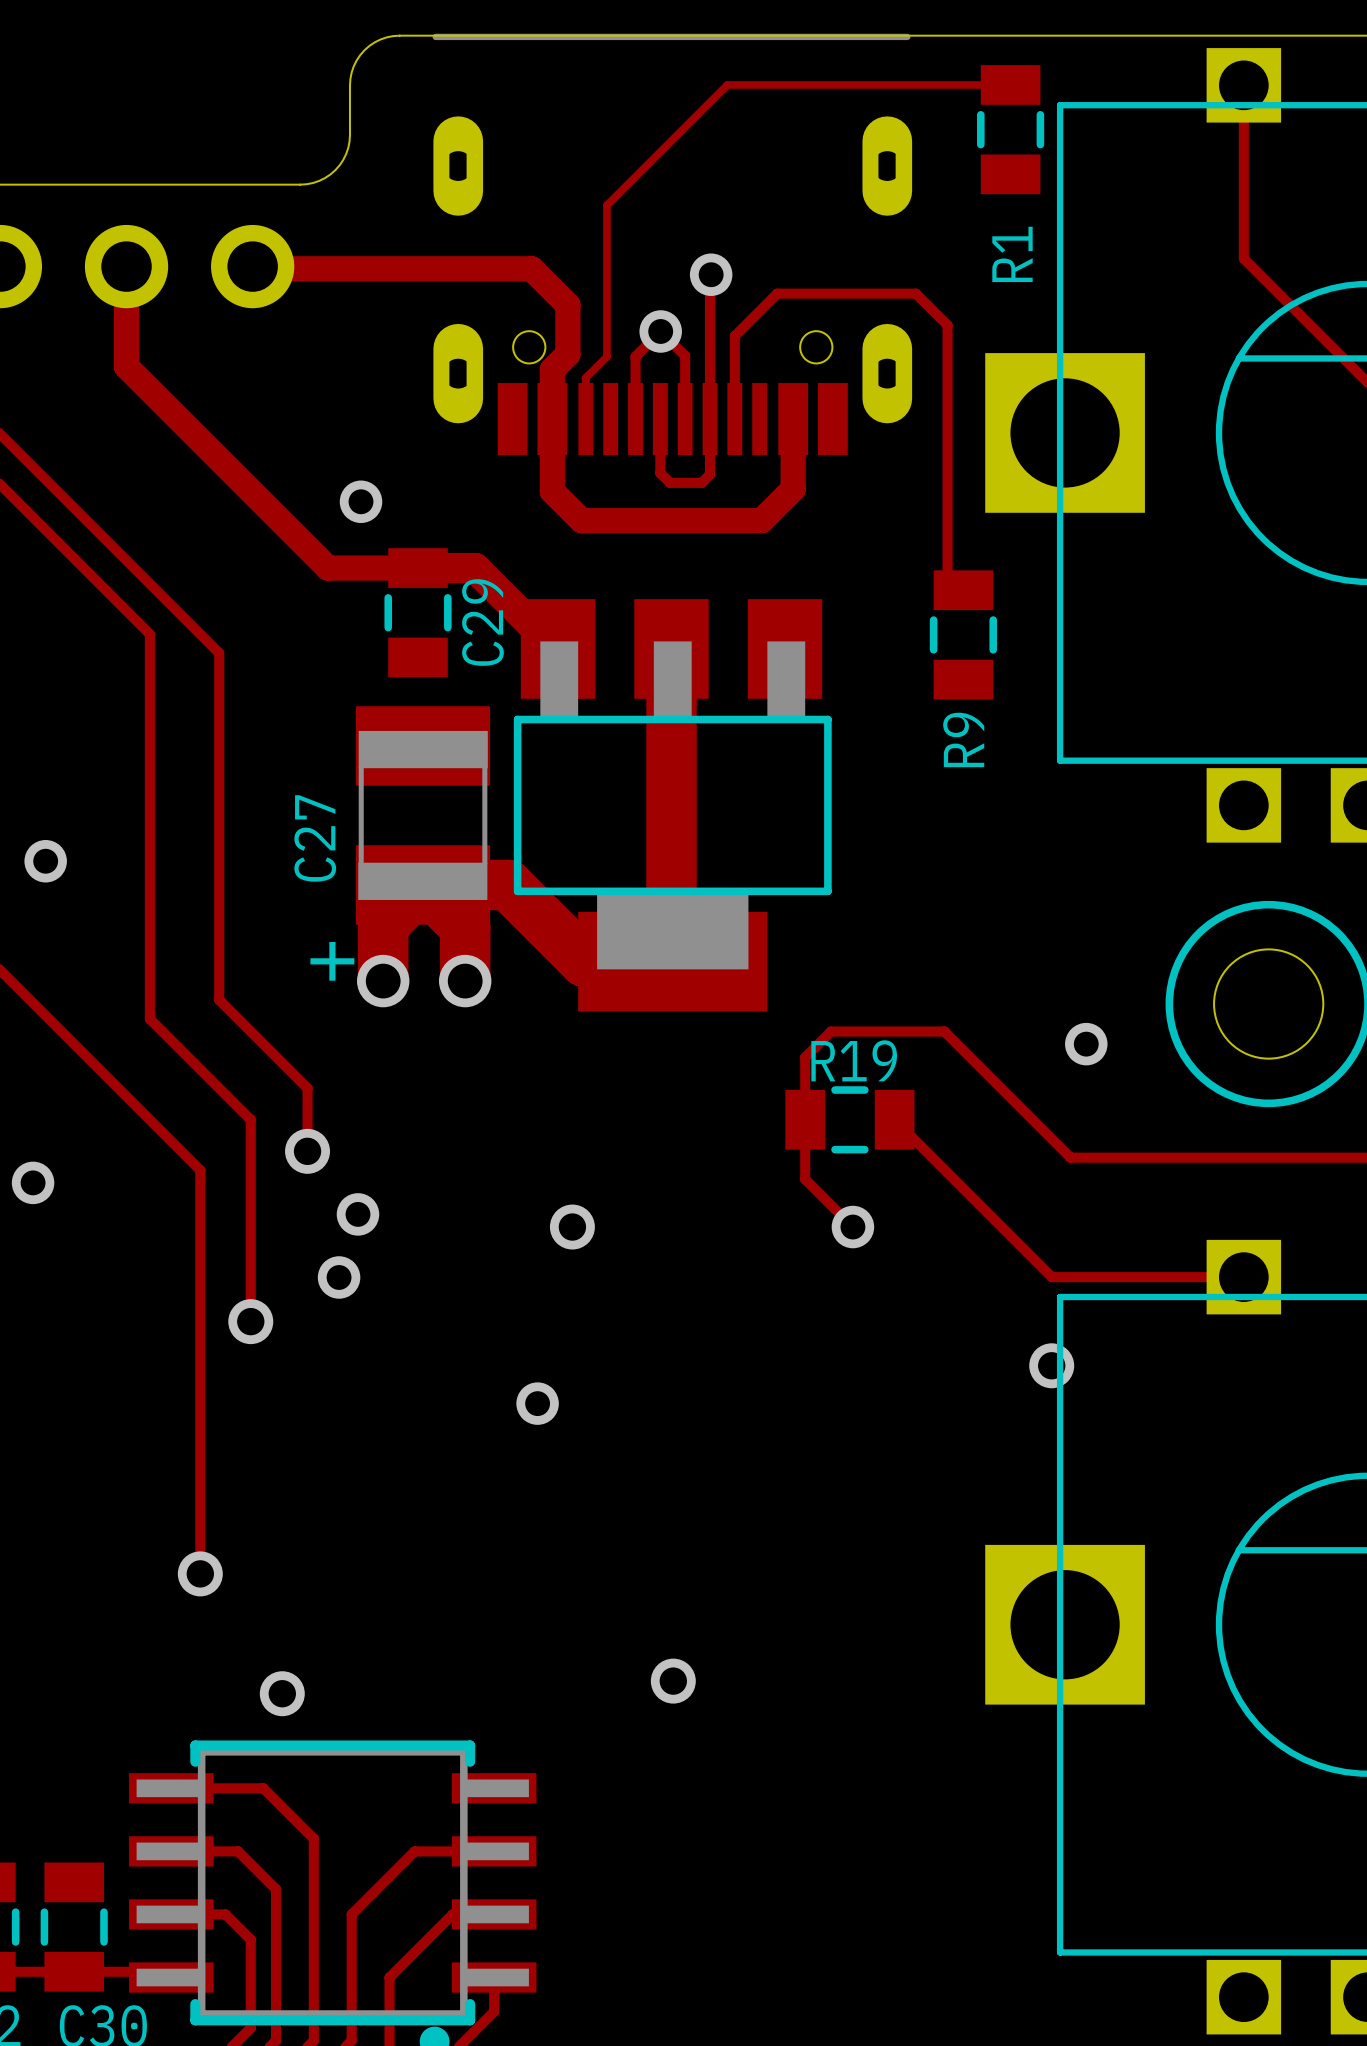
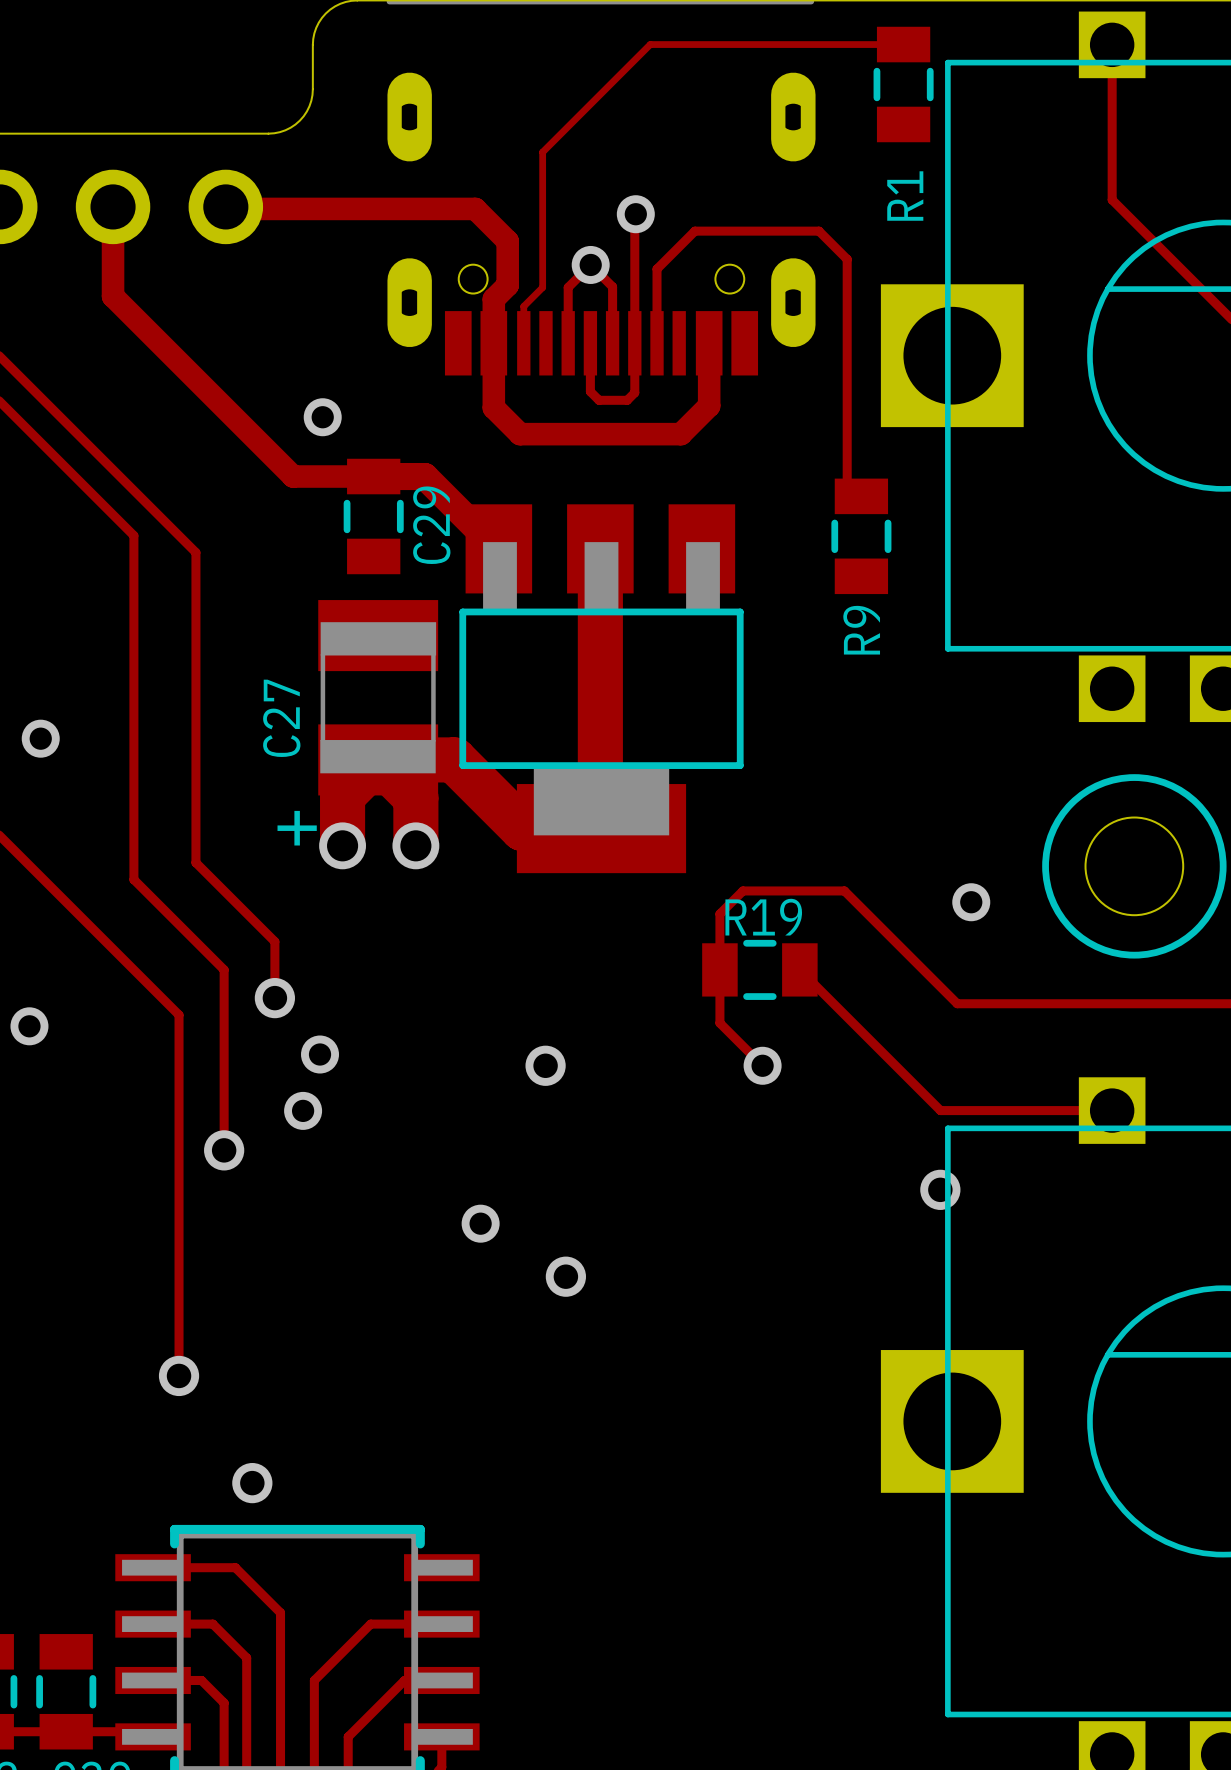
via position: (572, 1227) -> (545, 1065)
via: none -> (565, 1276)
via: (673, 1681) -> none

